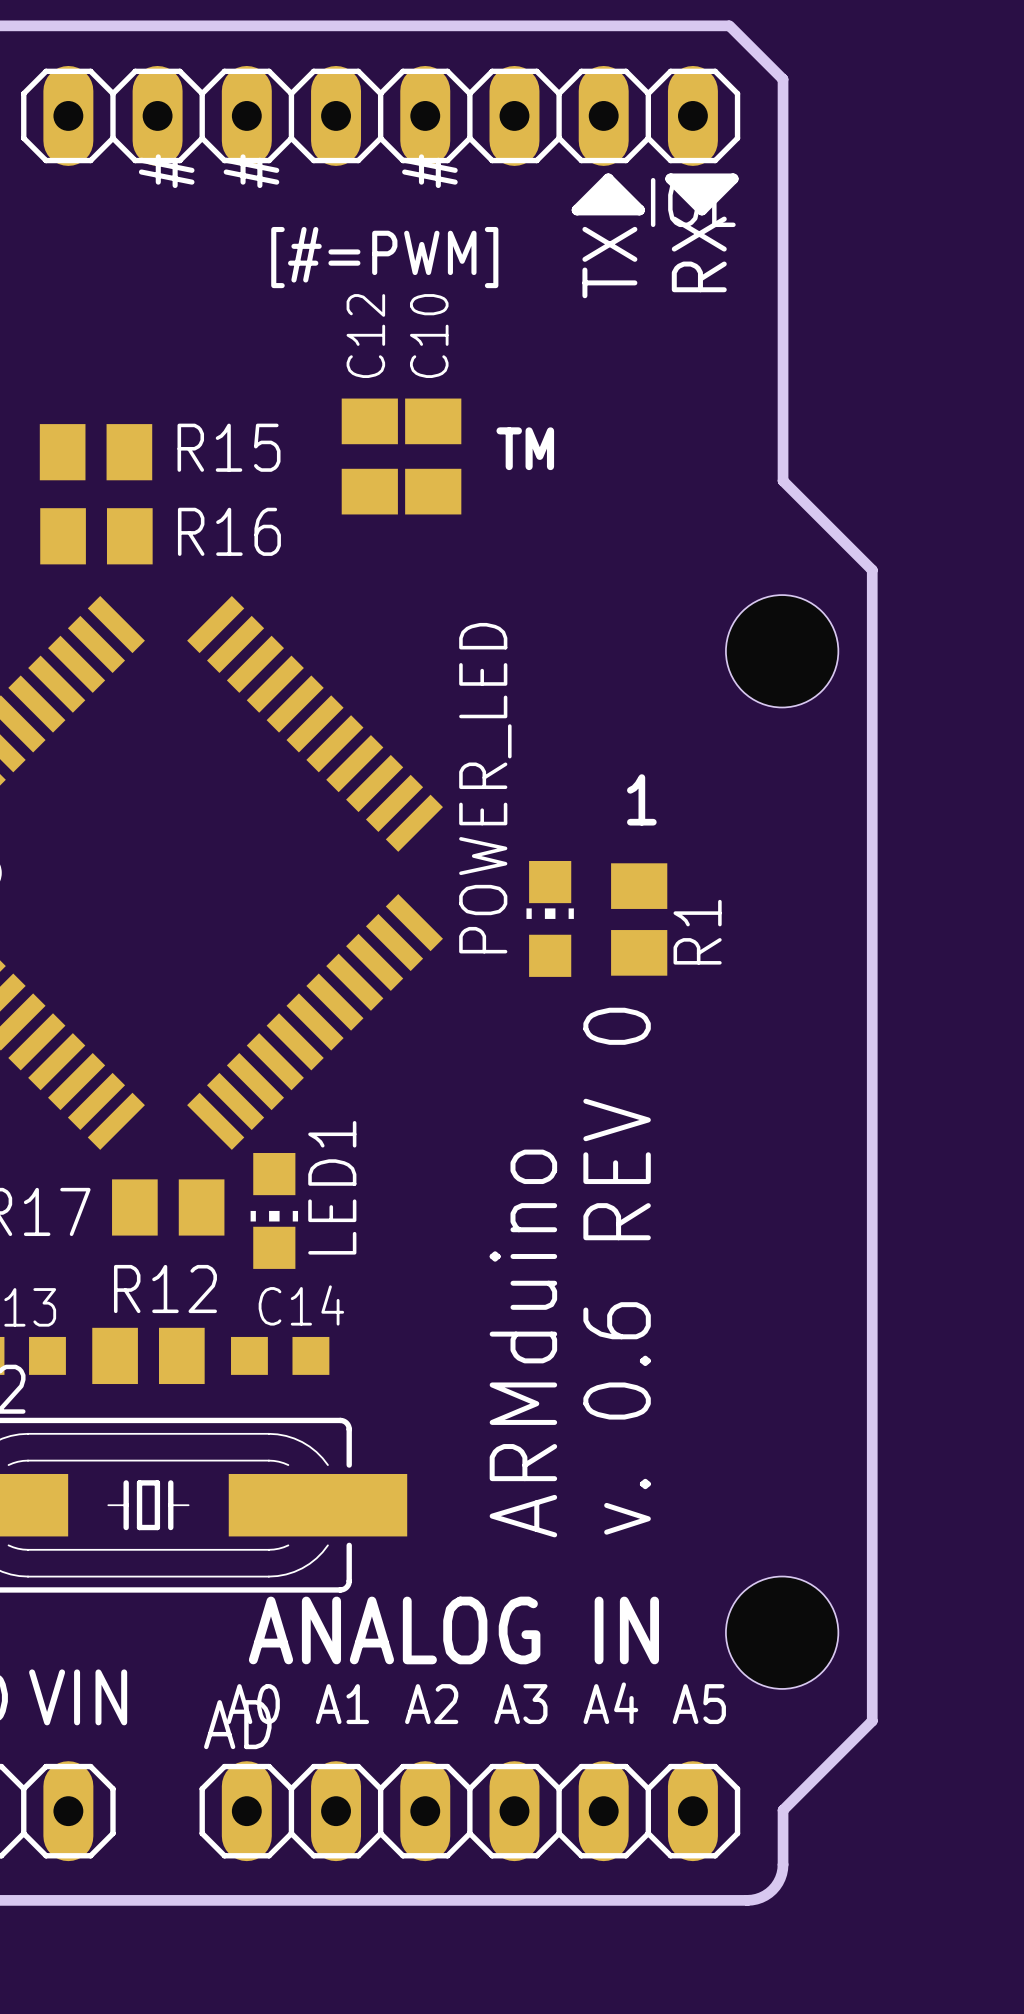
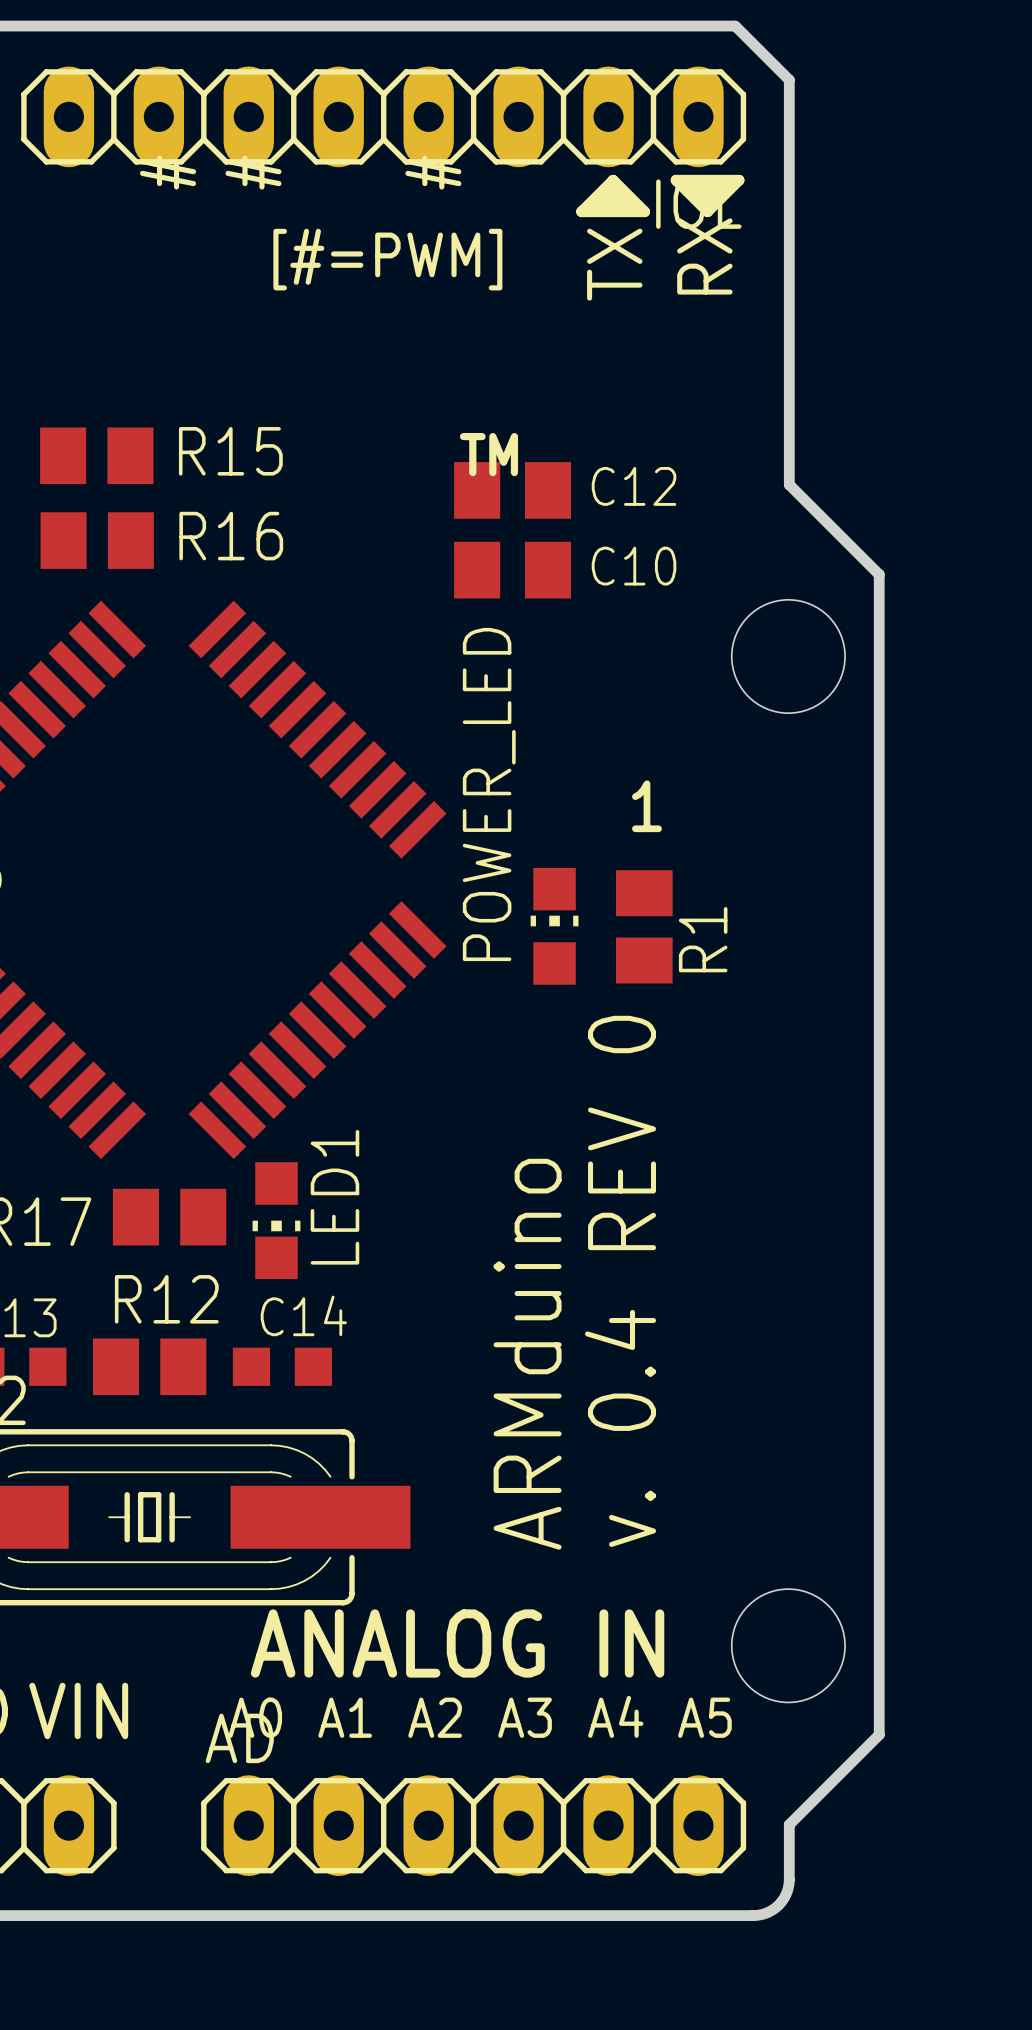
text position: TM (525, 448) -> TM (489, 454)
C12 rotation: 0° (369, 456) -> 90° clockwise (512, 490)
C12 position: (369, 456) -> (512, 490)
C10 rotation: 0° (433, 456) -> 90° clockwise (512, 570)
C10 position: (433, 456) -> (512, 570)
text: v. 0.6 REV 0 (617, 1271) -> v. 0.4 REV 0 (620, 1281)

